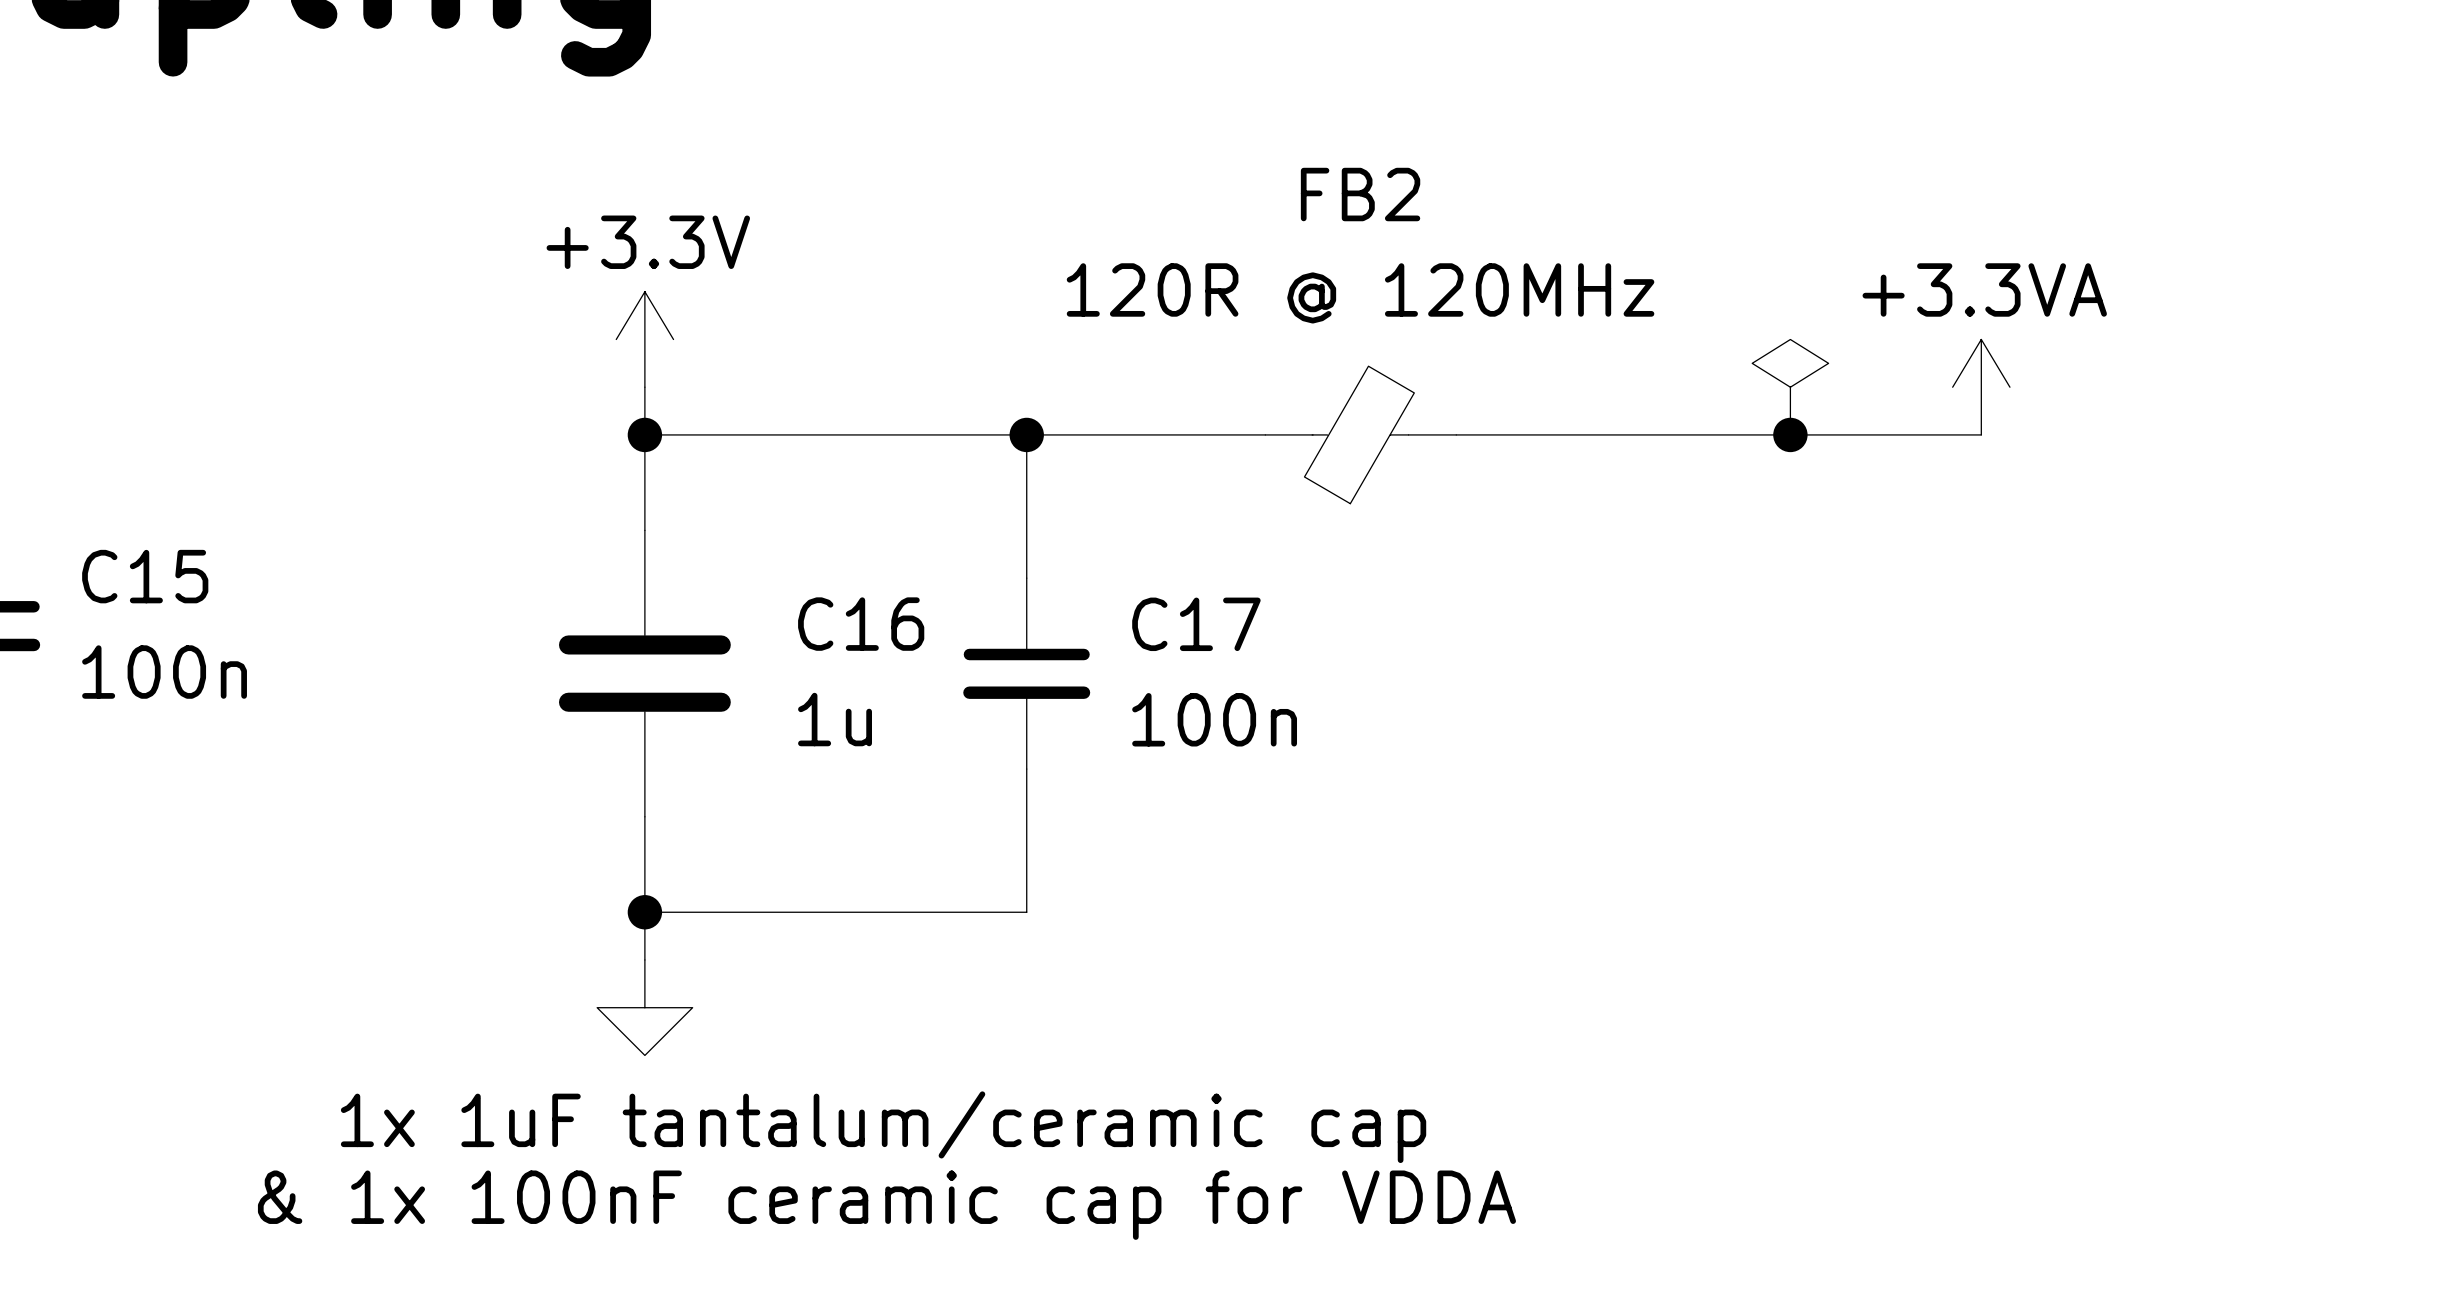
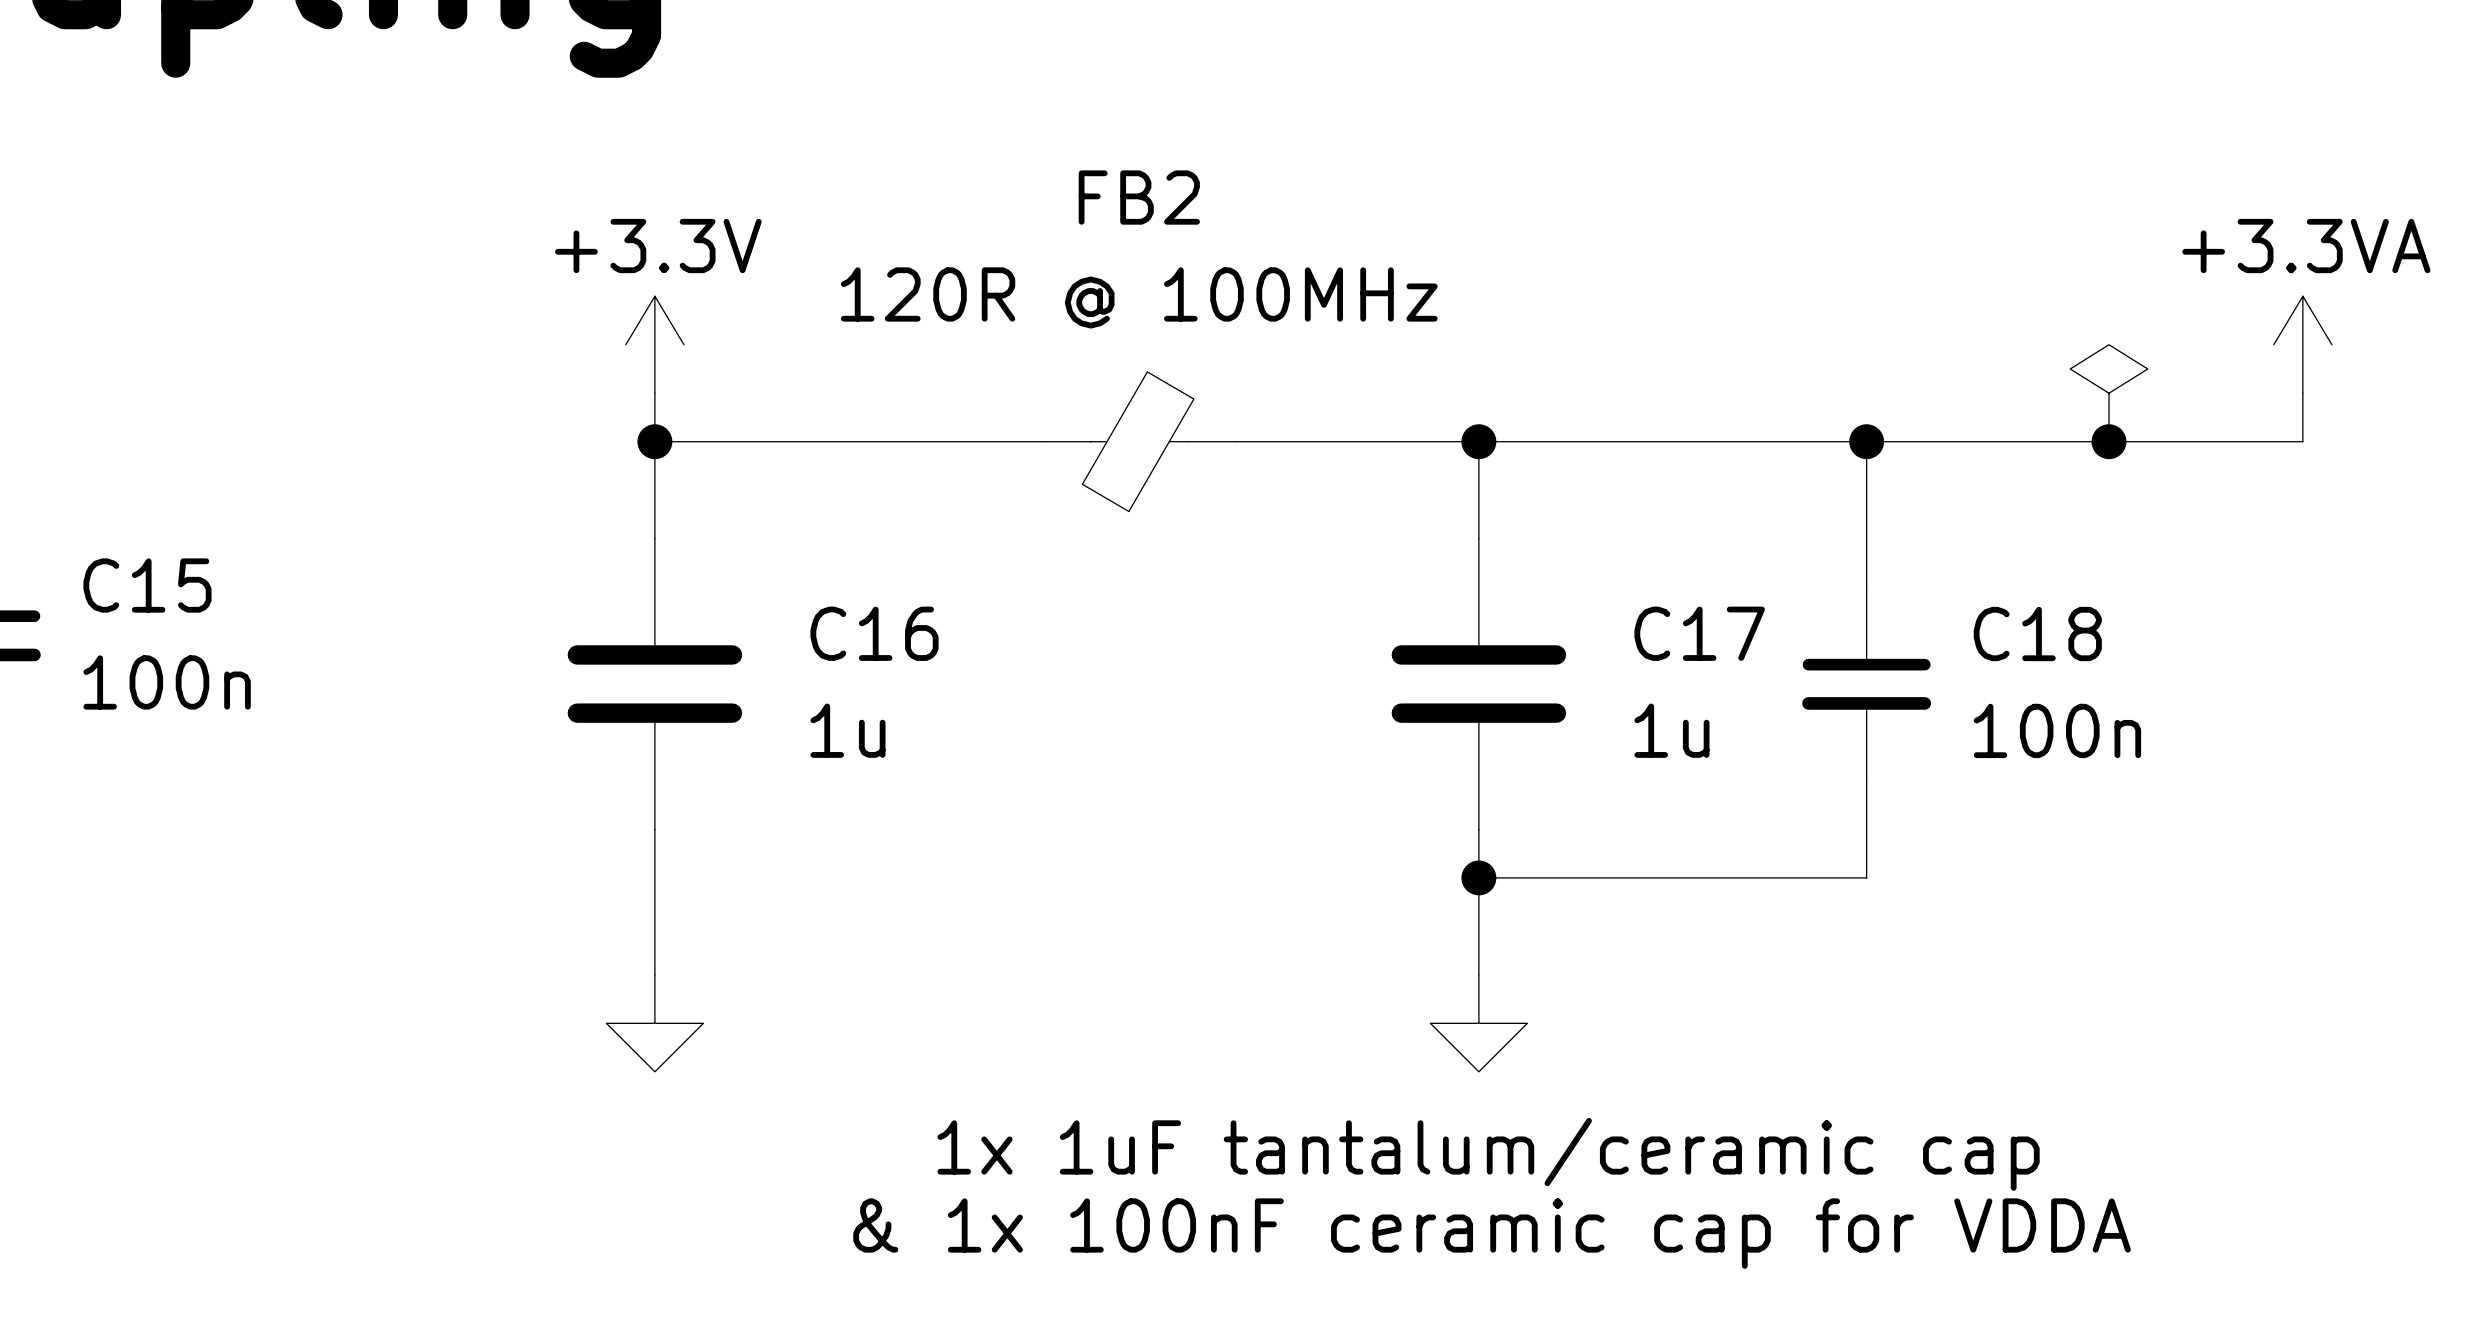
FB2 value: 120R @ 120MHz (1360, 293) -> 120R @ 100MHz (1139, 297)
power symbol position: (1790, 387) -> (2108, 393)
power symbol position: +3.3VA (1981, 387) -> +3.3VA (2302, 344)
wire: none -> (2302, 393) (2302, 441) (2012, 441)
junction: (1026, 434) -> none
wire: (1217, 434) (1026, 434) (1026, 578) -> none
wire: none -> (1285, 441) (1478, 441) (1478, 538)
FB2 position: (1360, 434) -> (1139, 441)
junction: none -> (1478, 441)
junction position: (1790, 434) -> (1866, 441)
wire: none -> (1866, 441) (1866, 587)
junction: none -> (2108, 441)
C17 symbol: [963, 578, 1091, 770] -> [1391, 538, 1567, 830]
C18: none -> 100n (1866, 684)
C17 value: 100n (1214, 719) -> 1u (1671, 730)
wire: (1026, 769) (1026, 912) (644, 912) -> none
wire: none -> (1866, 780) (1866, 877) (1478, 877)
wire: none -> (1478, 829) (1478, 974)
junction: none -> (1478, 877)
junction: (644, 912) -> none
power symbol: none -> (1478, 1023)
text position: 1x 1uF tantalum/ceramic cap (883, 1127) -> 1x 1uF tantalum/ceramic cap (1488, 1154)
text position: & 1x 100nF ceramic cap for VDDA (886, 1205) -> & 1x 100nF ceramic cap for VDDA (1492, 1233)

